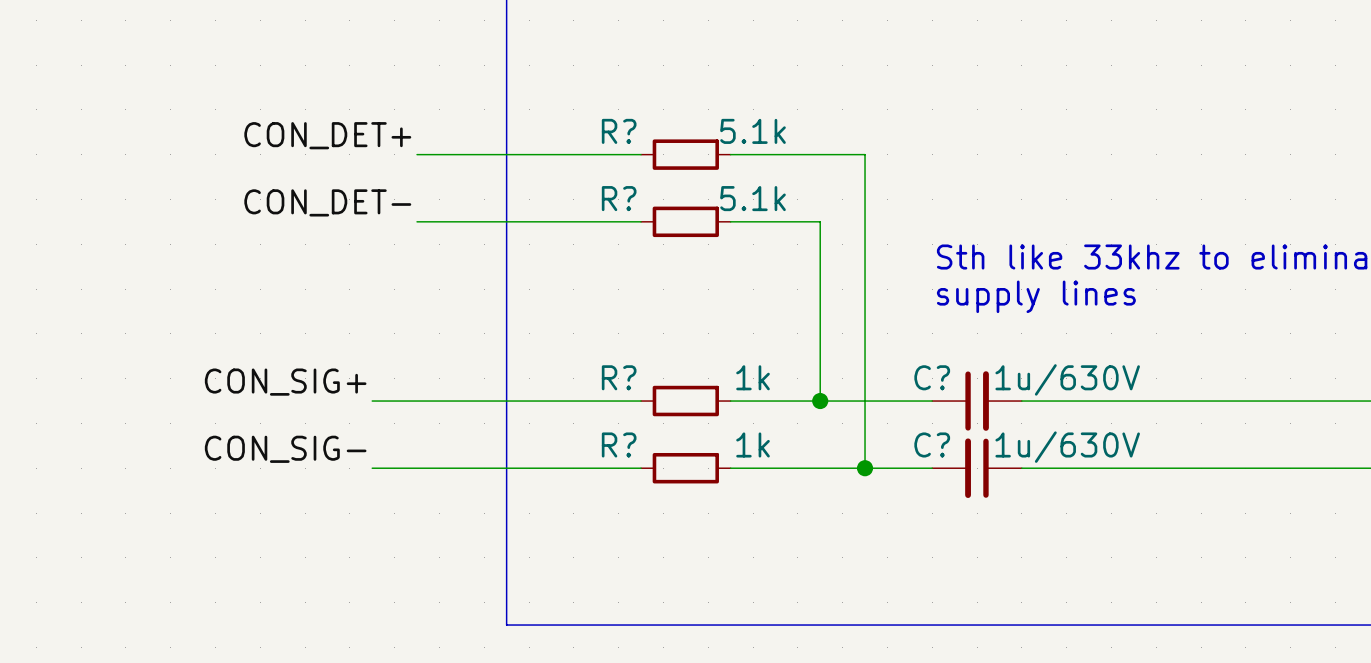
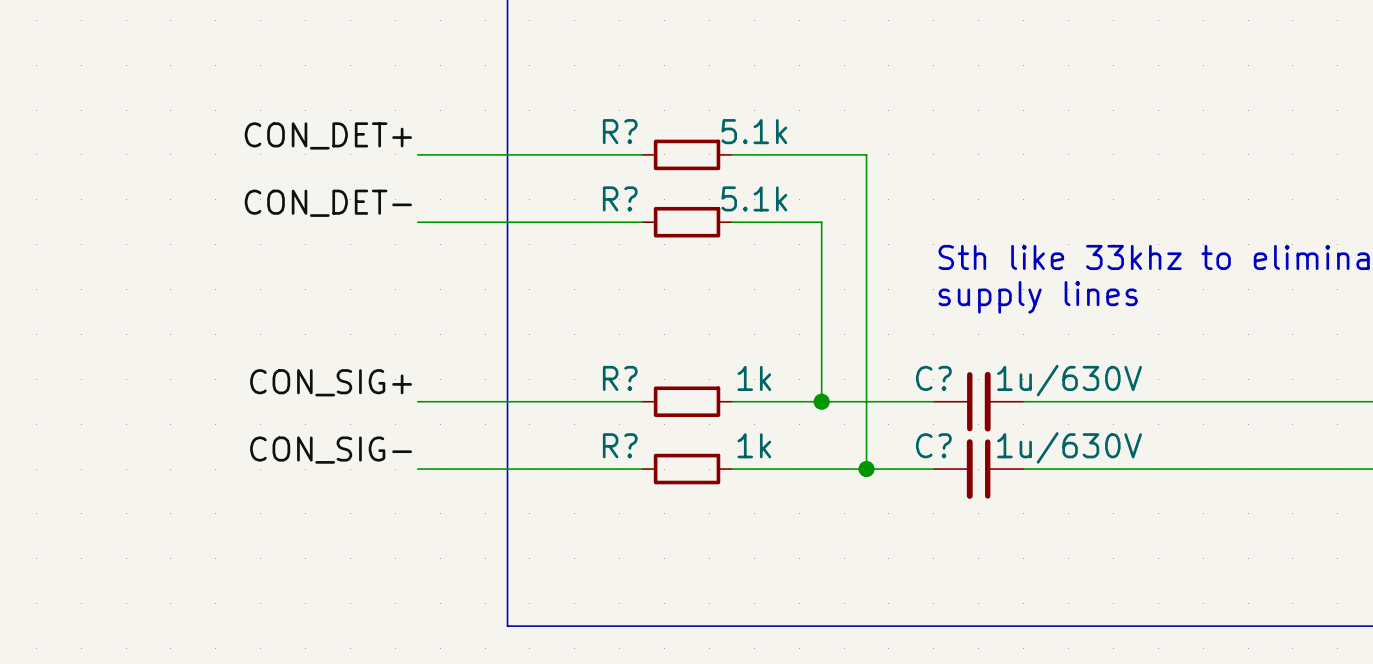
label position: CON_SIG+ (285, 382) -> CON_SIG+ (331, 382)
wire: (372, 401) (417, 401) -> none
label position: CON_SIG- (285, 449) -> CON_SIG- (331, 450)
wire: (372, 468) (417, 468) -> none

